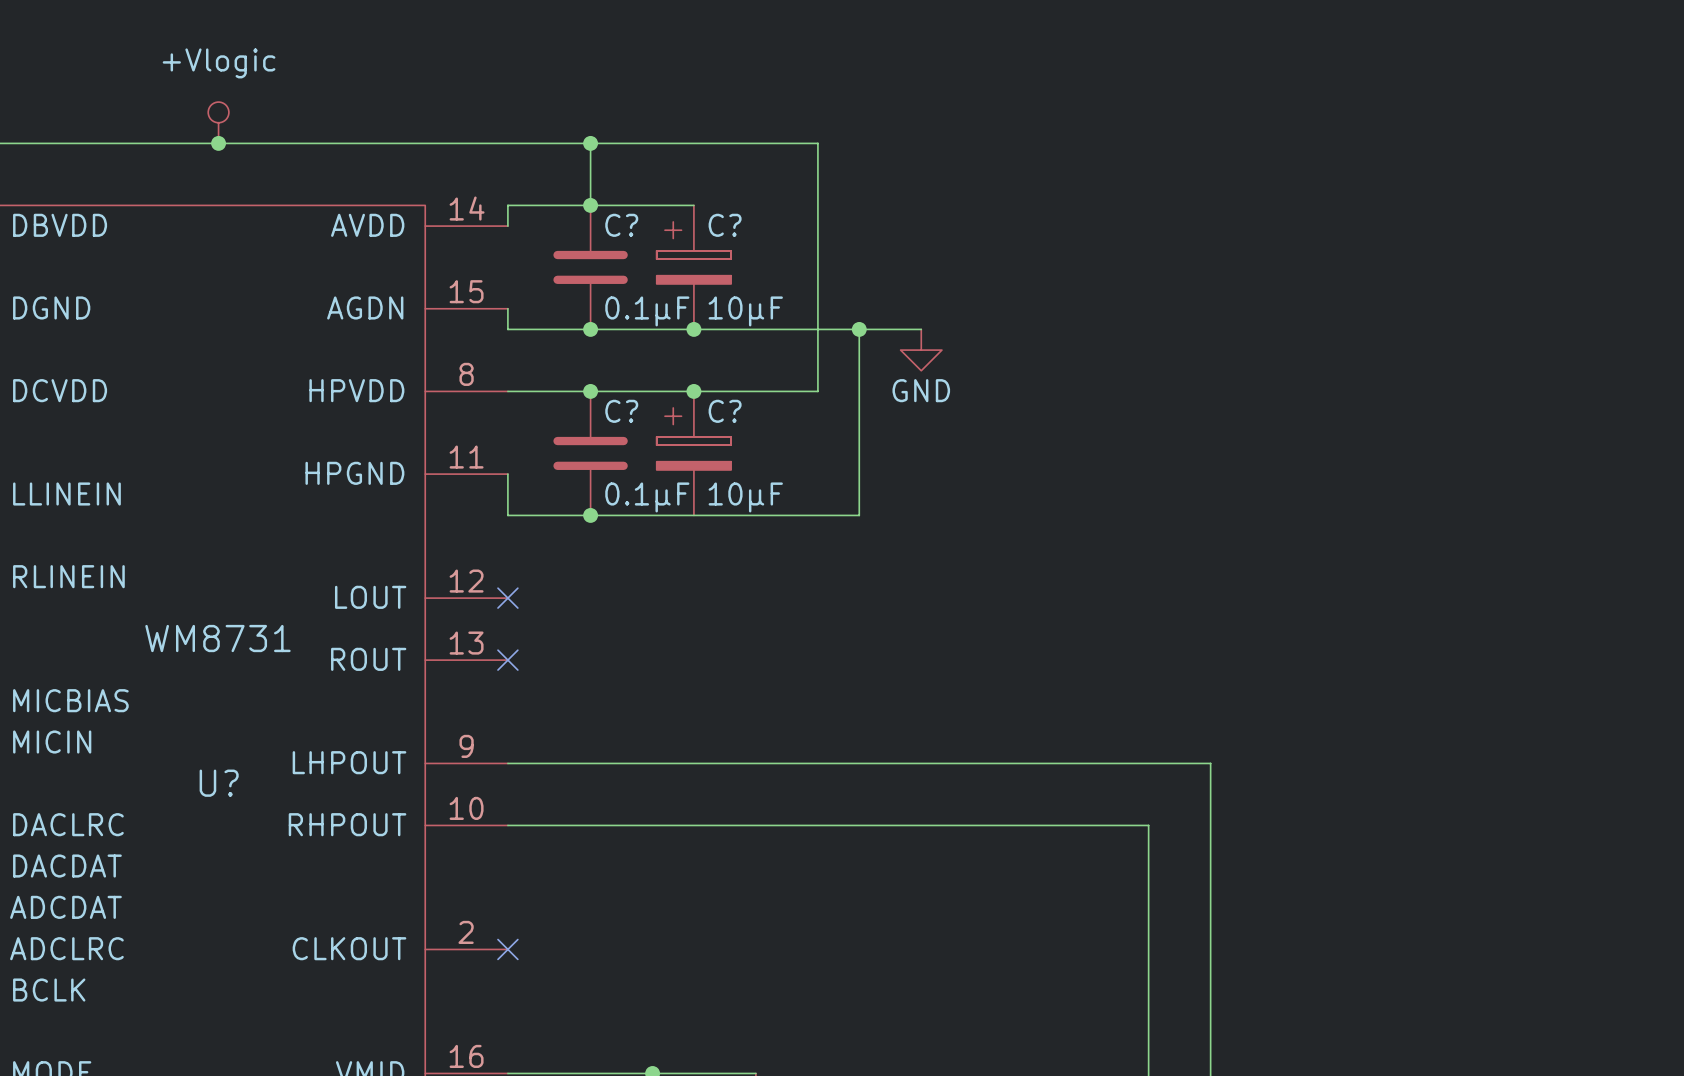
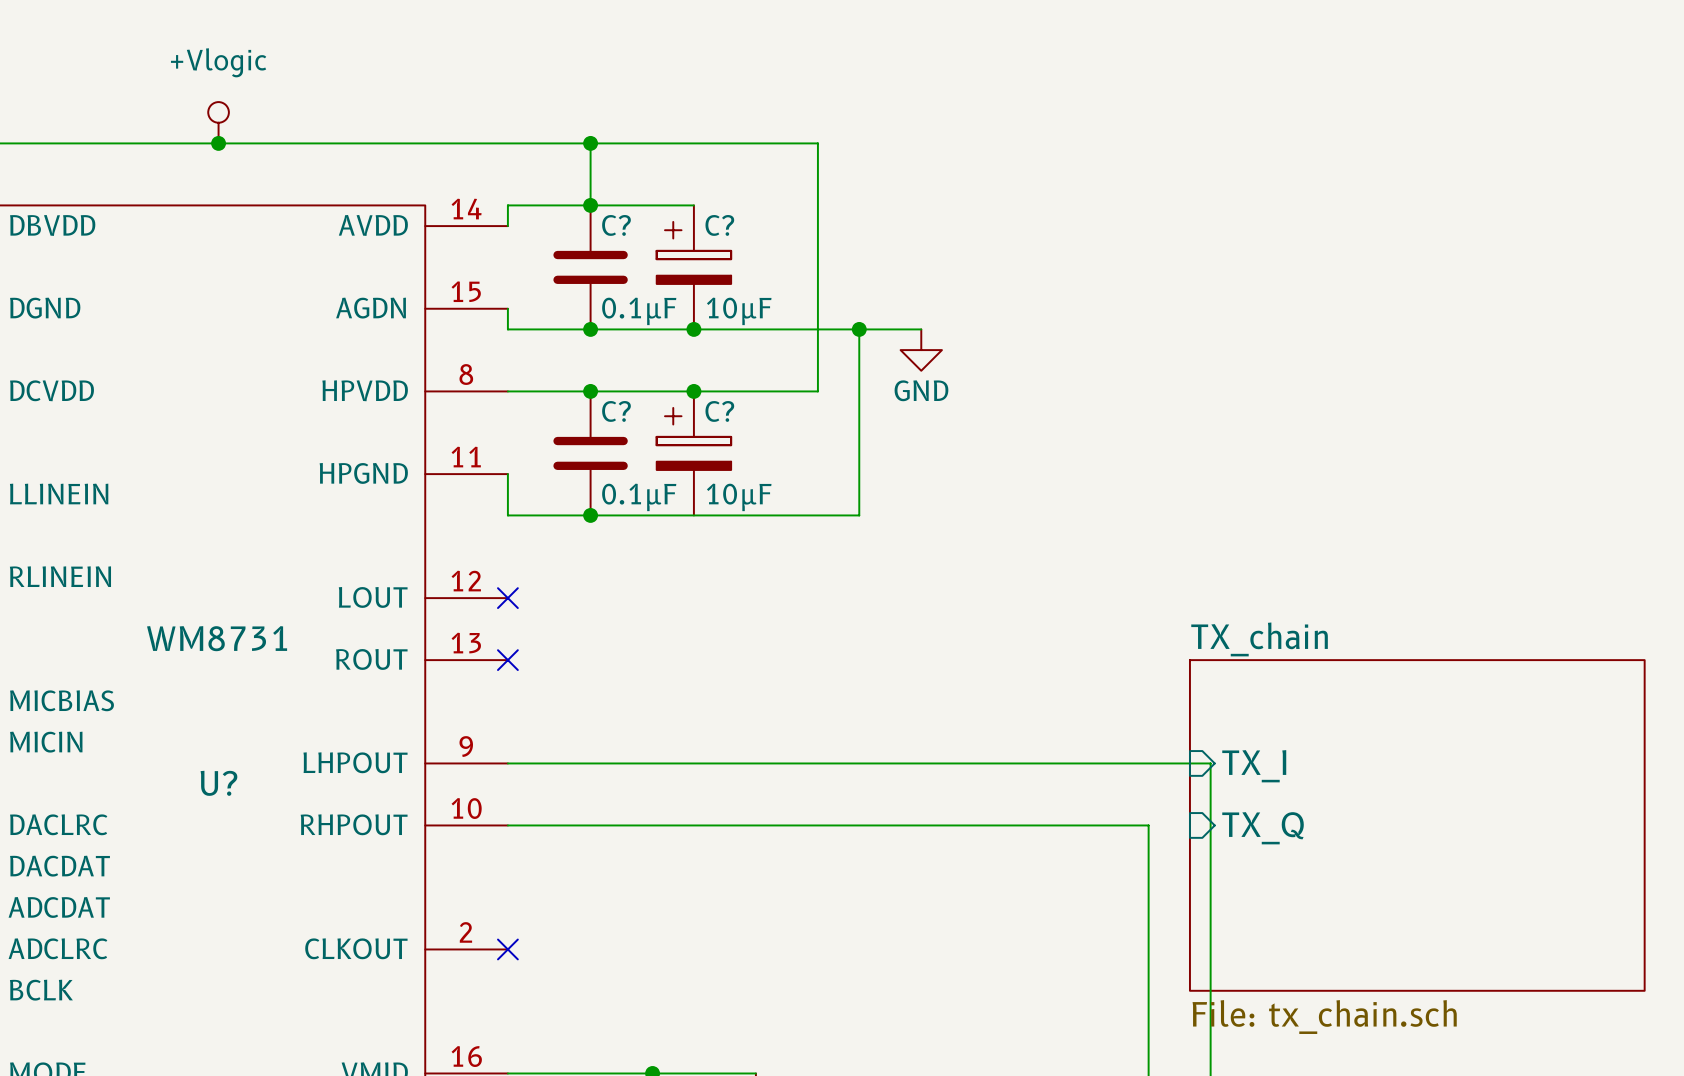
sheet pin: none -> TX_I (1254, 766)
sheet pin: none -> TX_Q (1263, 828)
sheet TX_chain: none -> File: tx_chain.sch (1417, 825)

